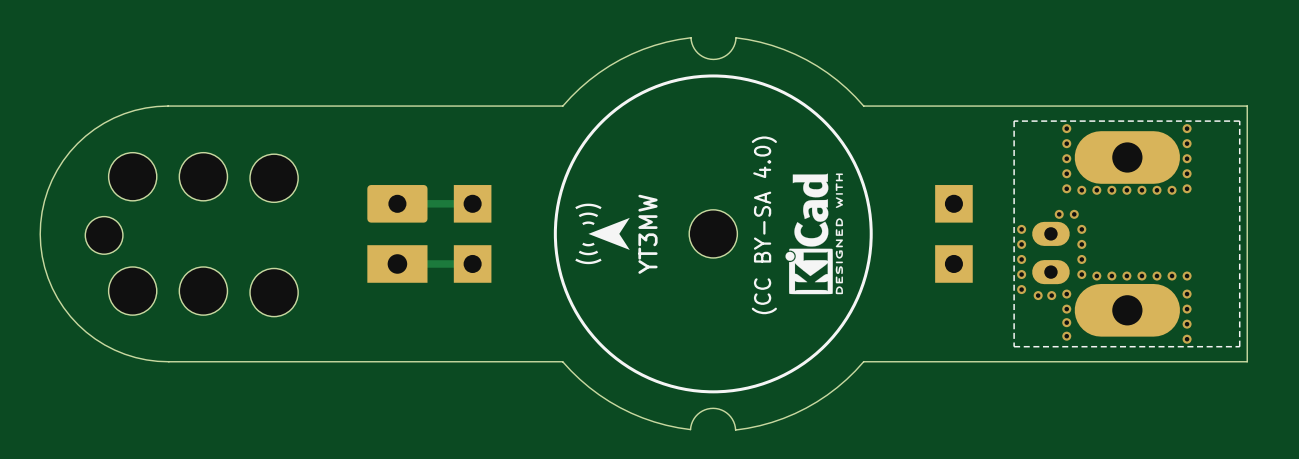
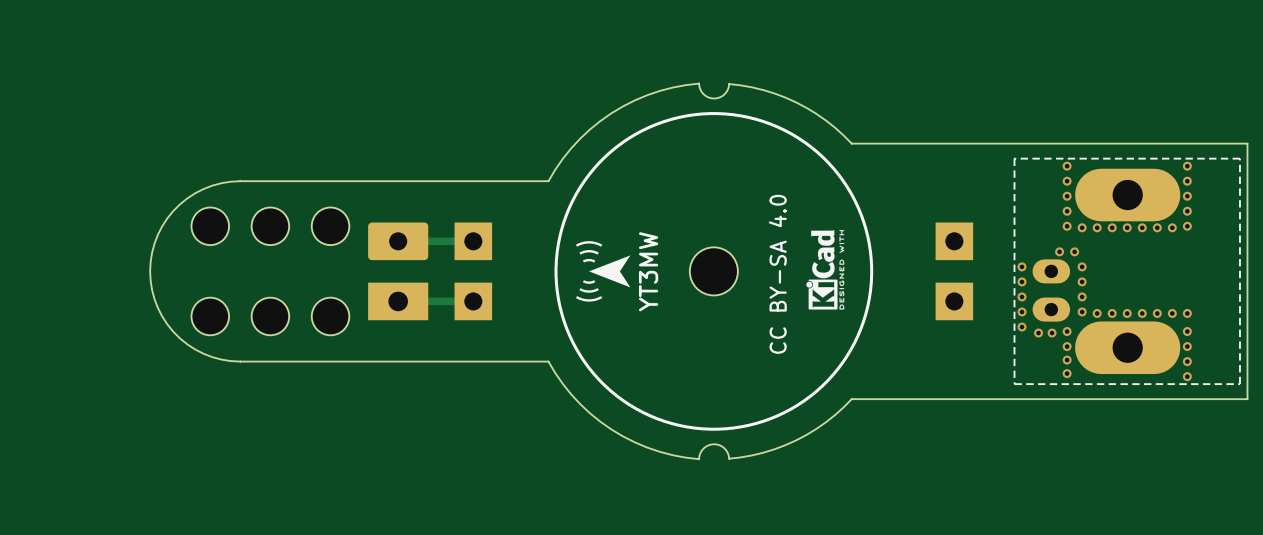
board edge: none -> (699, 83) (672, 87) (647, 95) (611, 113) (590, 129) (571, 148) (548, 181) (240, 181) (212, 185) (187, 198) (167, 218) (154, 243) (150, 271) (154, 299) (167, 324) (187, 344) (212, 357) (240, 361) (548, 361) (562, 384) (580, 404) (611, 429) (634, 442) (659, 451) (699, 459)
board edge: (863, 106) (846, 88) (827, 72) (806, 59) (783, 49) (760, 42) (736, 37) (732, 48) (726, 55) (719, 58) (710, 59) (702, 56) (695, 50) (690, 37) (654, 45) (620, 59) (589, 80) (562, 106) (168, 106) (134, 110) (104, 123) (77, 143) (63, 160) (47, 190) (42, 212) (40, 245) (44, 267) (52, 288) (63, 307) (78, 324) (104, 344) (125, 354) (146, 359) (168, 361) (562, 361) (579, 379) (599, 394) (620, 407) (642, 417) (666, 425) (690, 429) (692, 421) (699, 412) (707, 409) (716, 408) (724, 411) (730, 416) (735, 430) -> (864, 143) (851, 143) (816, 113) (774, 93) (729, 84) (724, 94) (711, 98) (702, 92) (699, 83)
part footprint: [179, 152, 228, 201] -> [191, 207, 230, 246]
part footprint: [250, 154, 299, 203] -> [251, 207, 290, 246]
drawing shape: [785, 173, 844, 295] -> [806, 230, 845, 310]
part: (132, 176) -> none
part: none -> (330, 226)
text: (CC BY-SA 4.0) (764, 225) -> CC BY-SA 4.0 (777, 274)
part: (104, 235) -> none
part footprint: [179, 266, 228, 316] -> [191, 297, 230, 336]
part footprint: [250, 268, 299, 317] -> [251, 297, 290, 336]
part: none -> (330, 316)
part: (132, 291) -> none
board edge: (863, 361) (837, 387) (806, 408) (771, 422) (735, 430) -> (864, 399) (851, 399) (816, 429) (774, 449) (729, 458) (724, 448) (711, 444) (703, 448) (699, 459)

